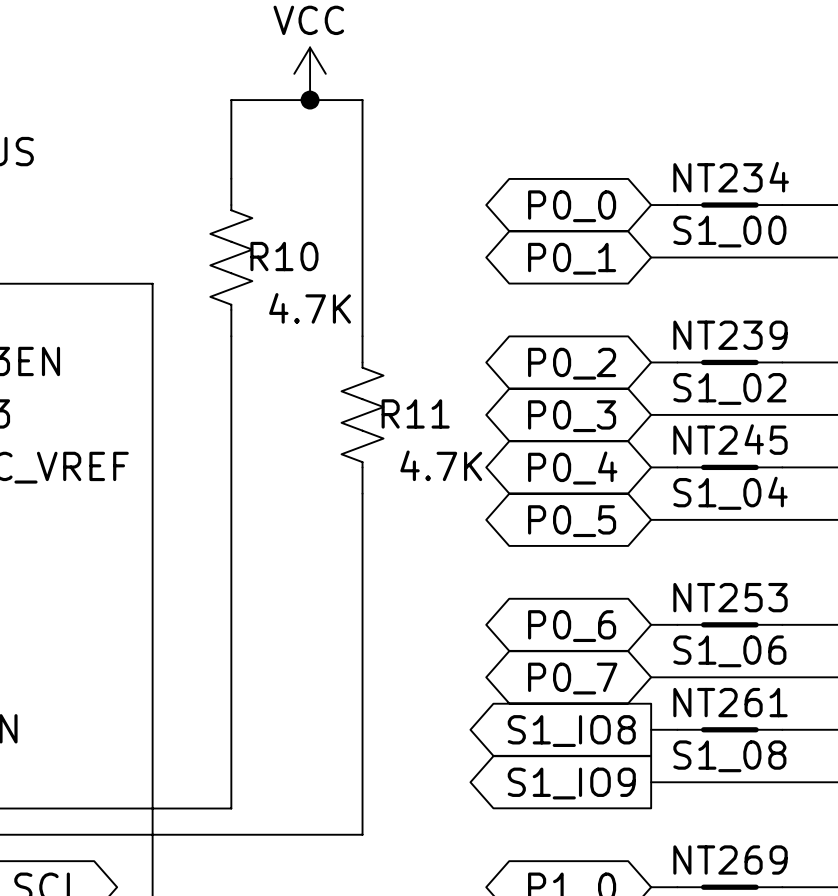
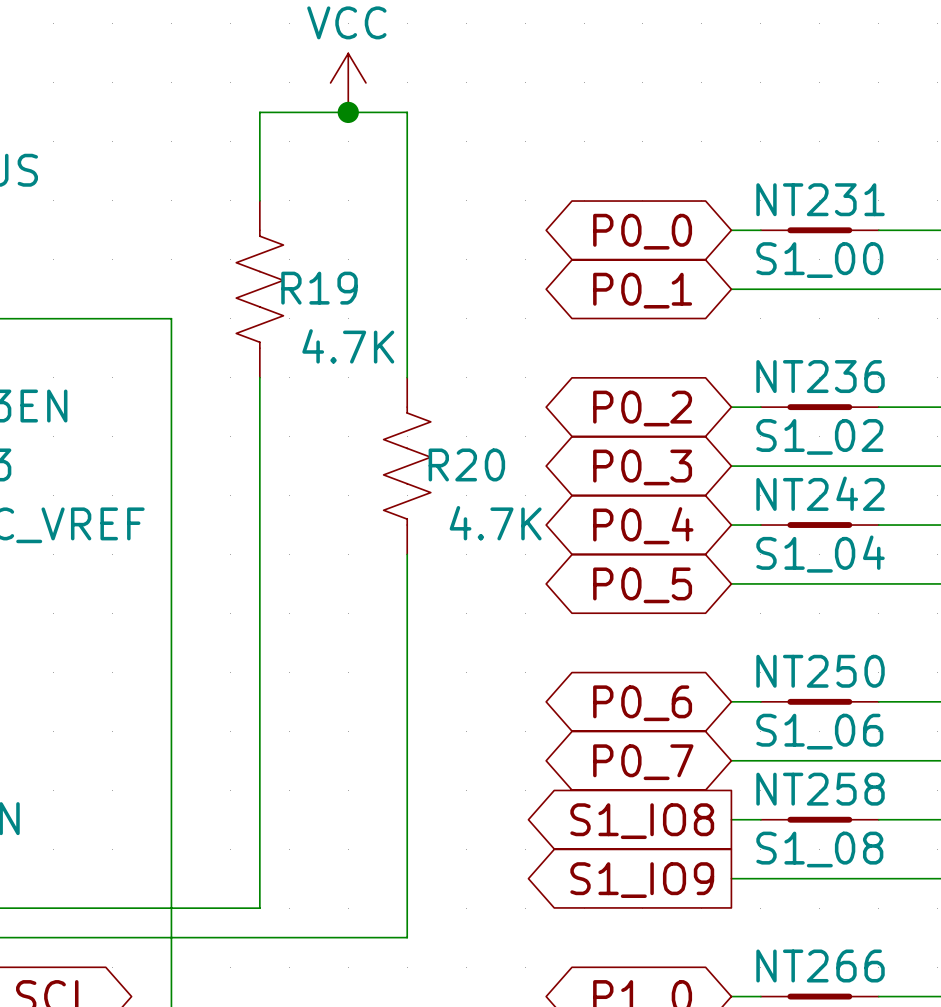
NT234 name: NT234 (731, 177) -> NT231 (820, 199)
R10 name: R10 (284, 256) -> R19 (319, 288)
NT239 name: NT239 (730, 335) -> NT236 (820, 376)
R11 name: R11 (415, 413) -> R20 (466, 464)
NT245 name: NT245 (730, 439) -> NT242 (820, 493)
NT253 name: NT253 (730, 597) -> NT250 (820, 671)
NT261 name: NT261 (730, 702) -> NT258 (820, 789)
NT269 name: NT269 (730, 860) -> NT266 (820, 965)

